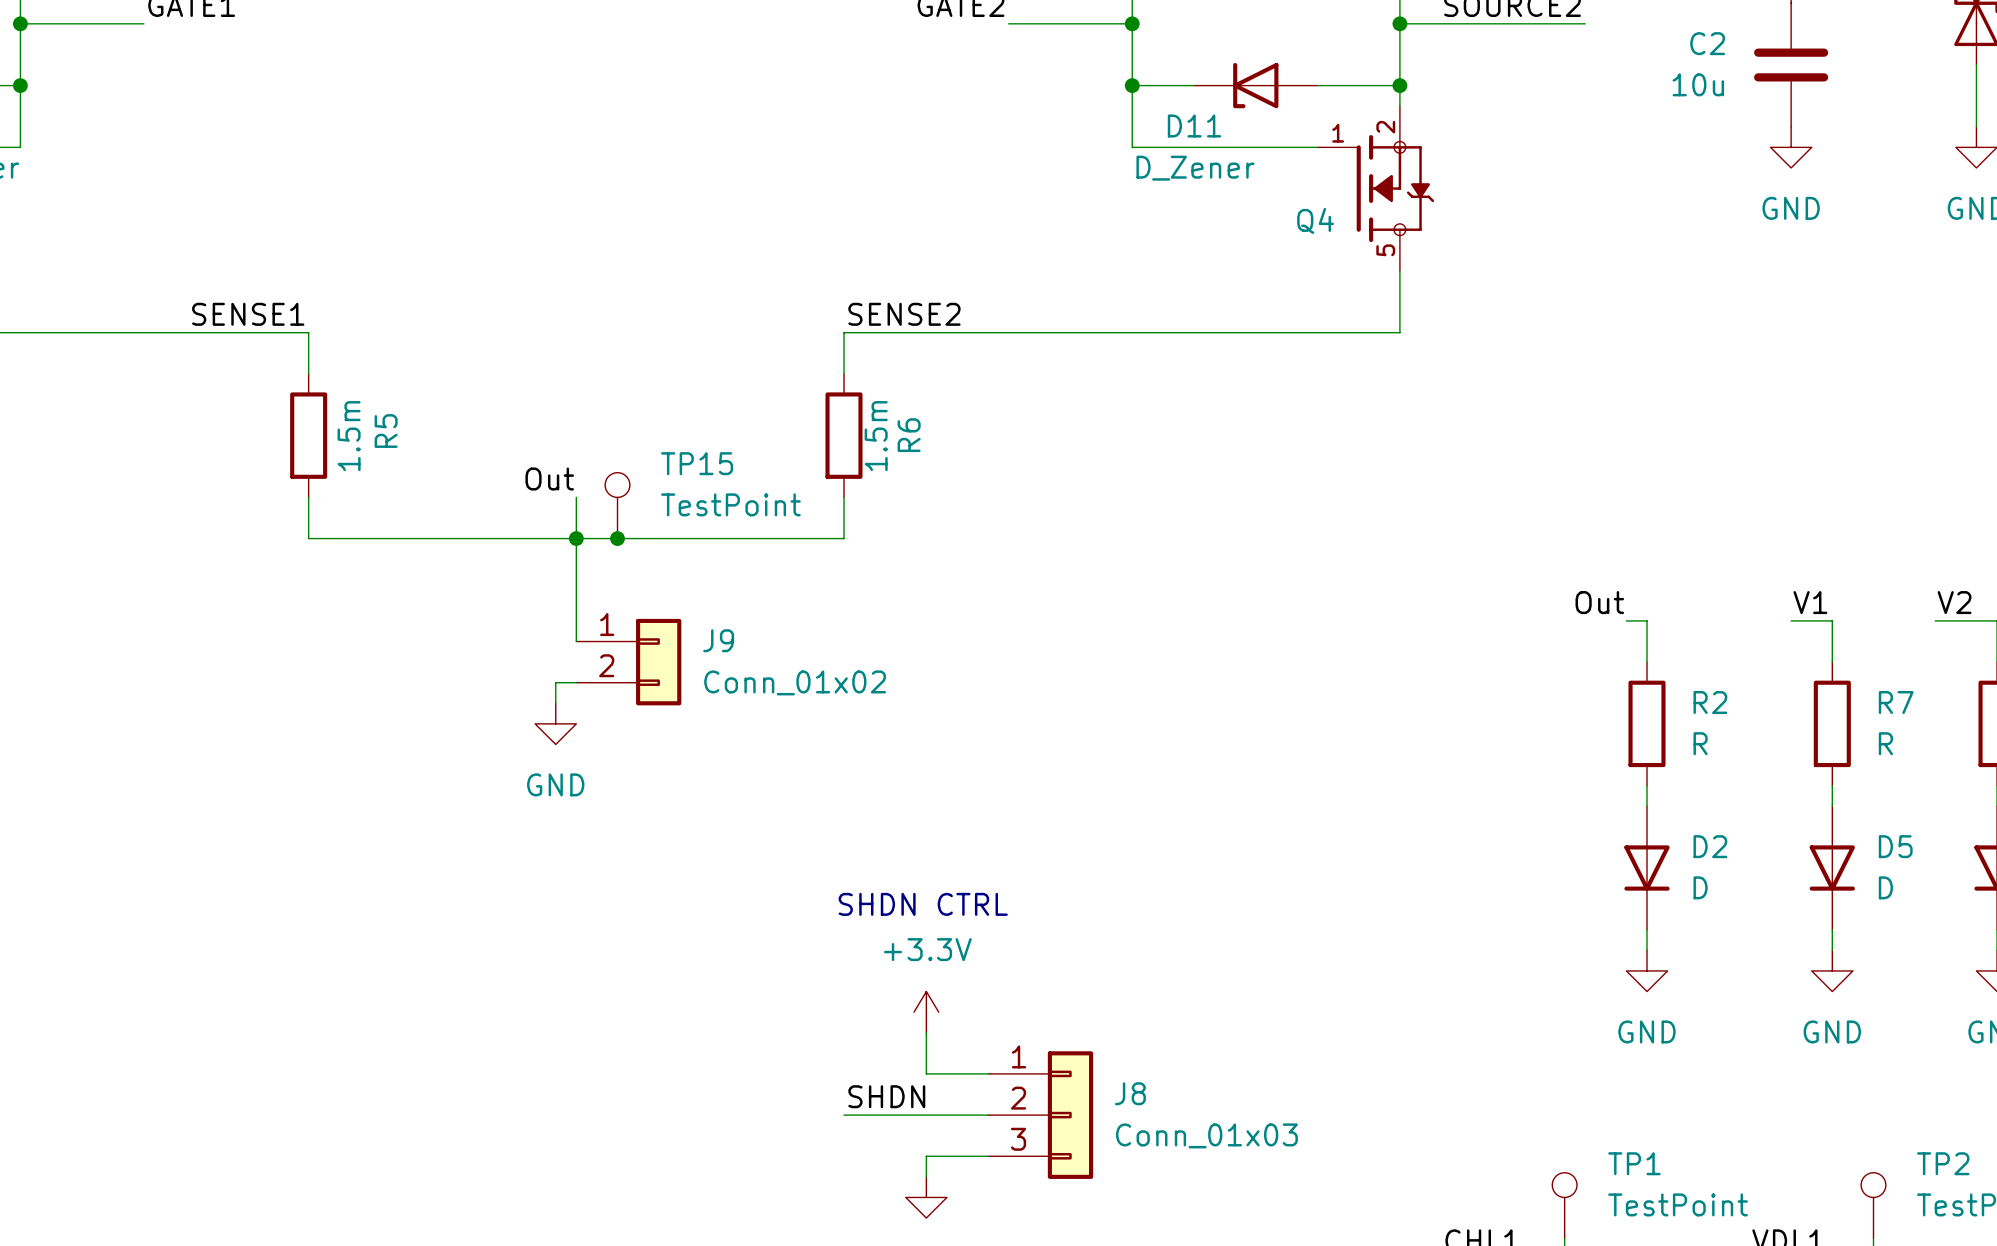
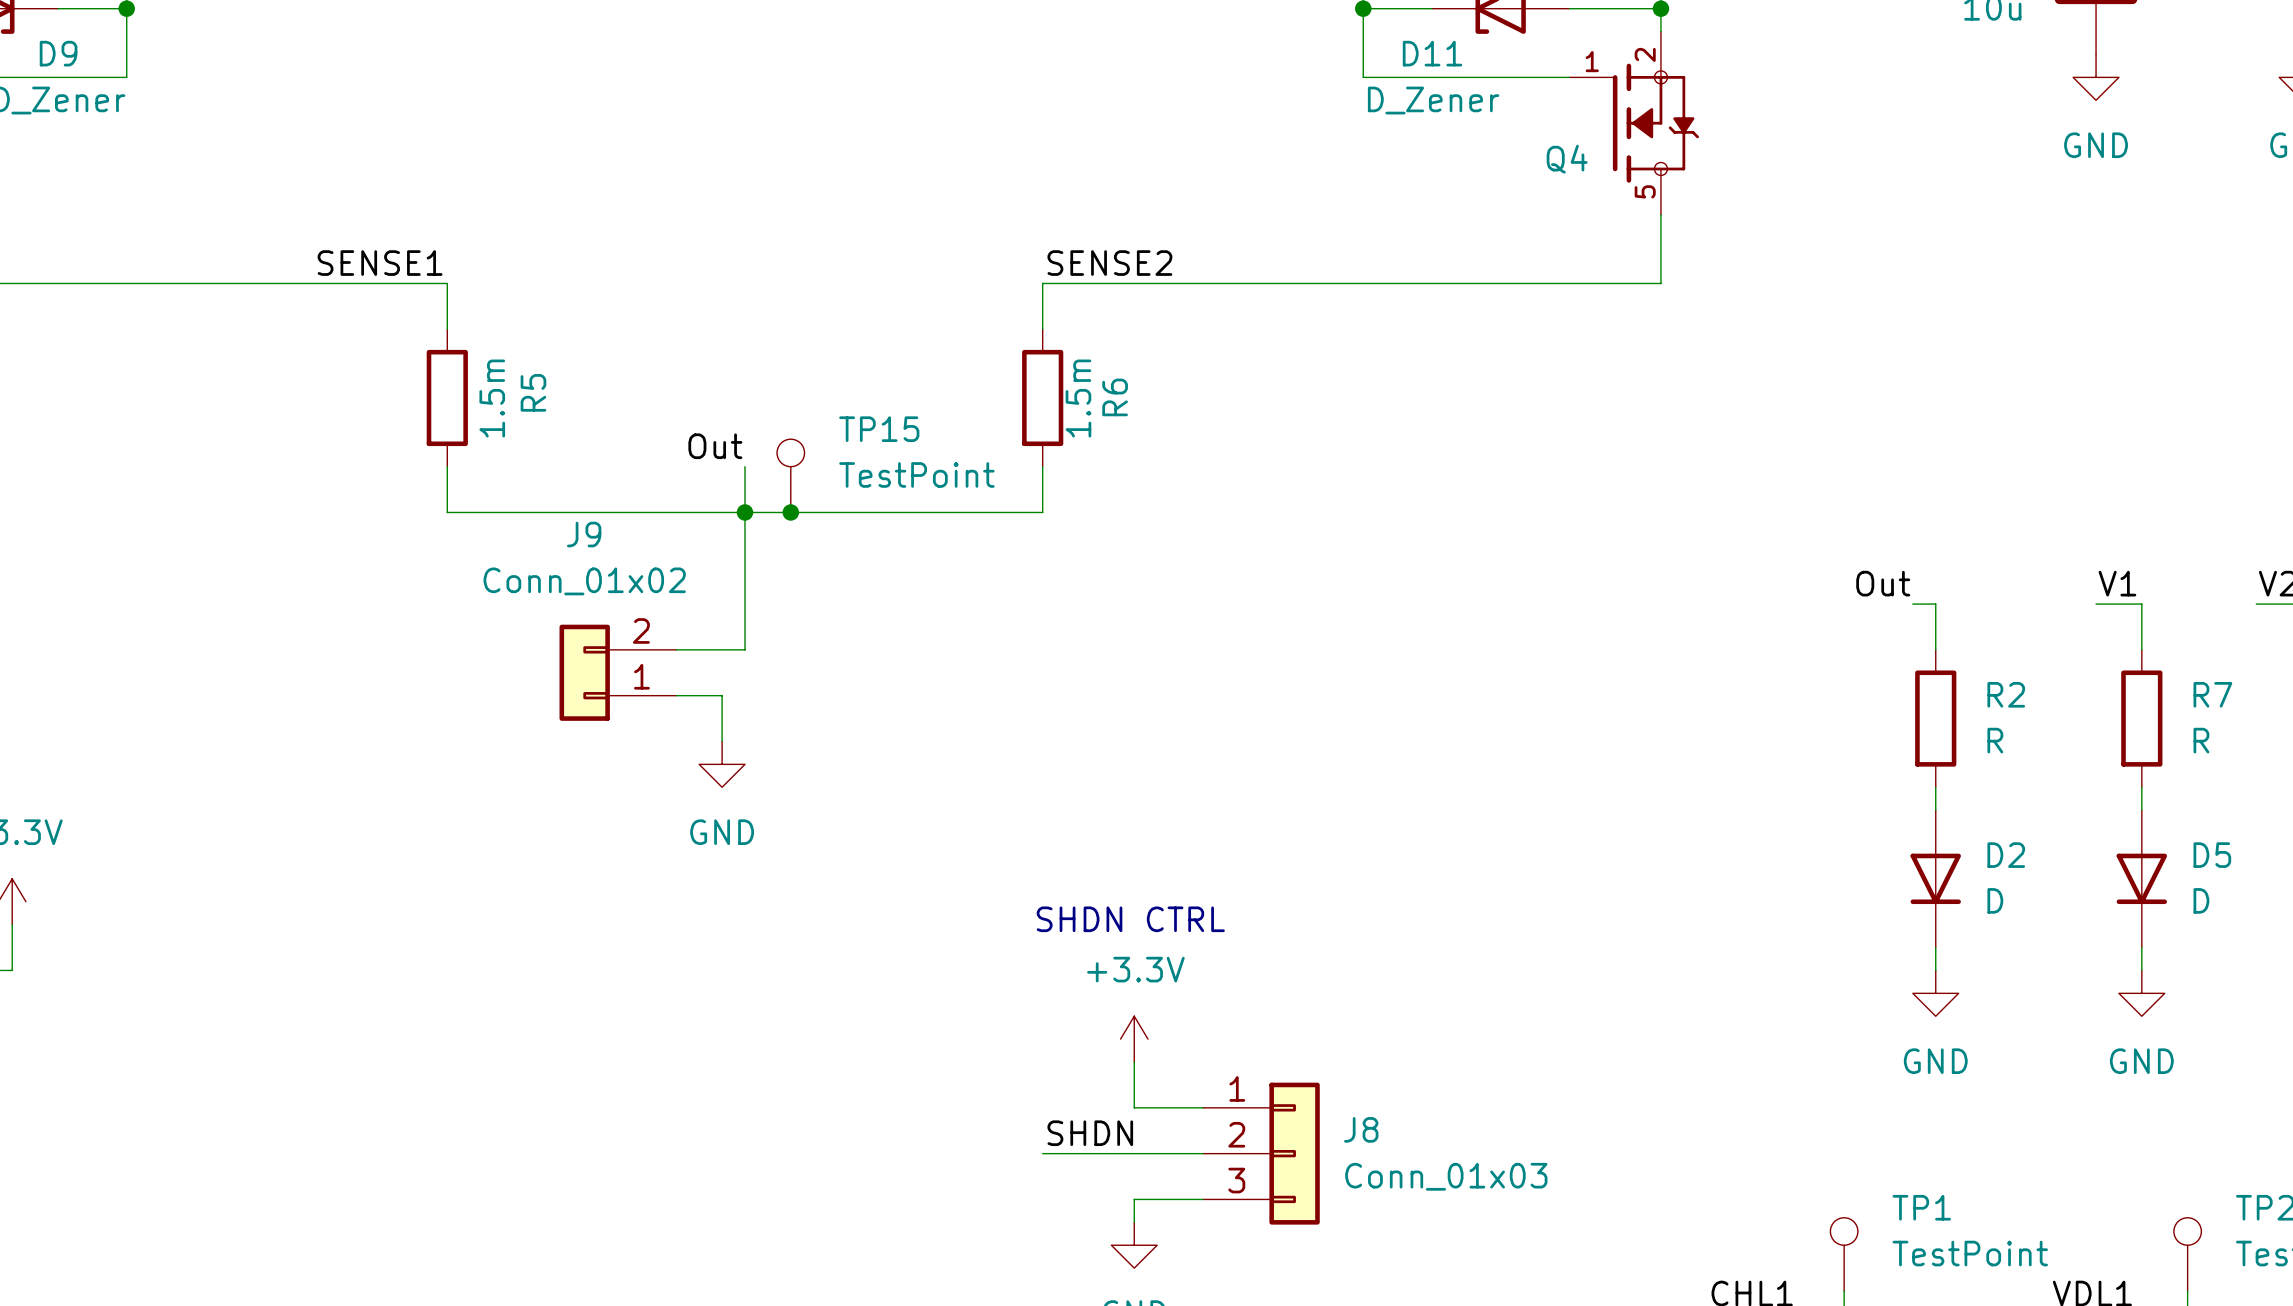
J9 name position: J9 (718, 640) -> J9 (584, 534)
wire: none -> (744, 626) (744, 649) (676, 649)
J9 position: (628, 662) -> (617, 672)
J9 rotation: 0° (658, 662) -> 180° (584, 672)
wire: (576, 682) (555, 682) (555, 703) -> none
J9 value position: Conn_01x02 (795, 682) -> Conn_01x02 (584, 581)
wire: none -> (676, 695) (722, 695) (722, 741)
power symbol position: GND (555, 723) -> GND (722, 764)

